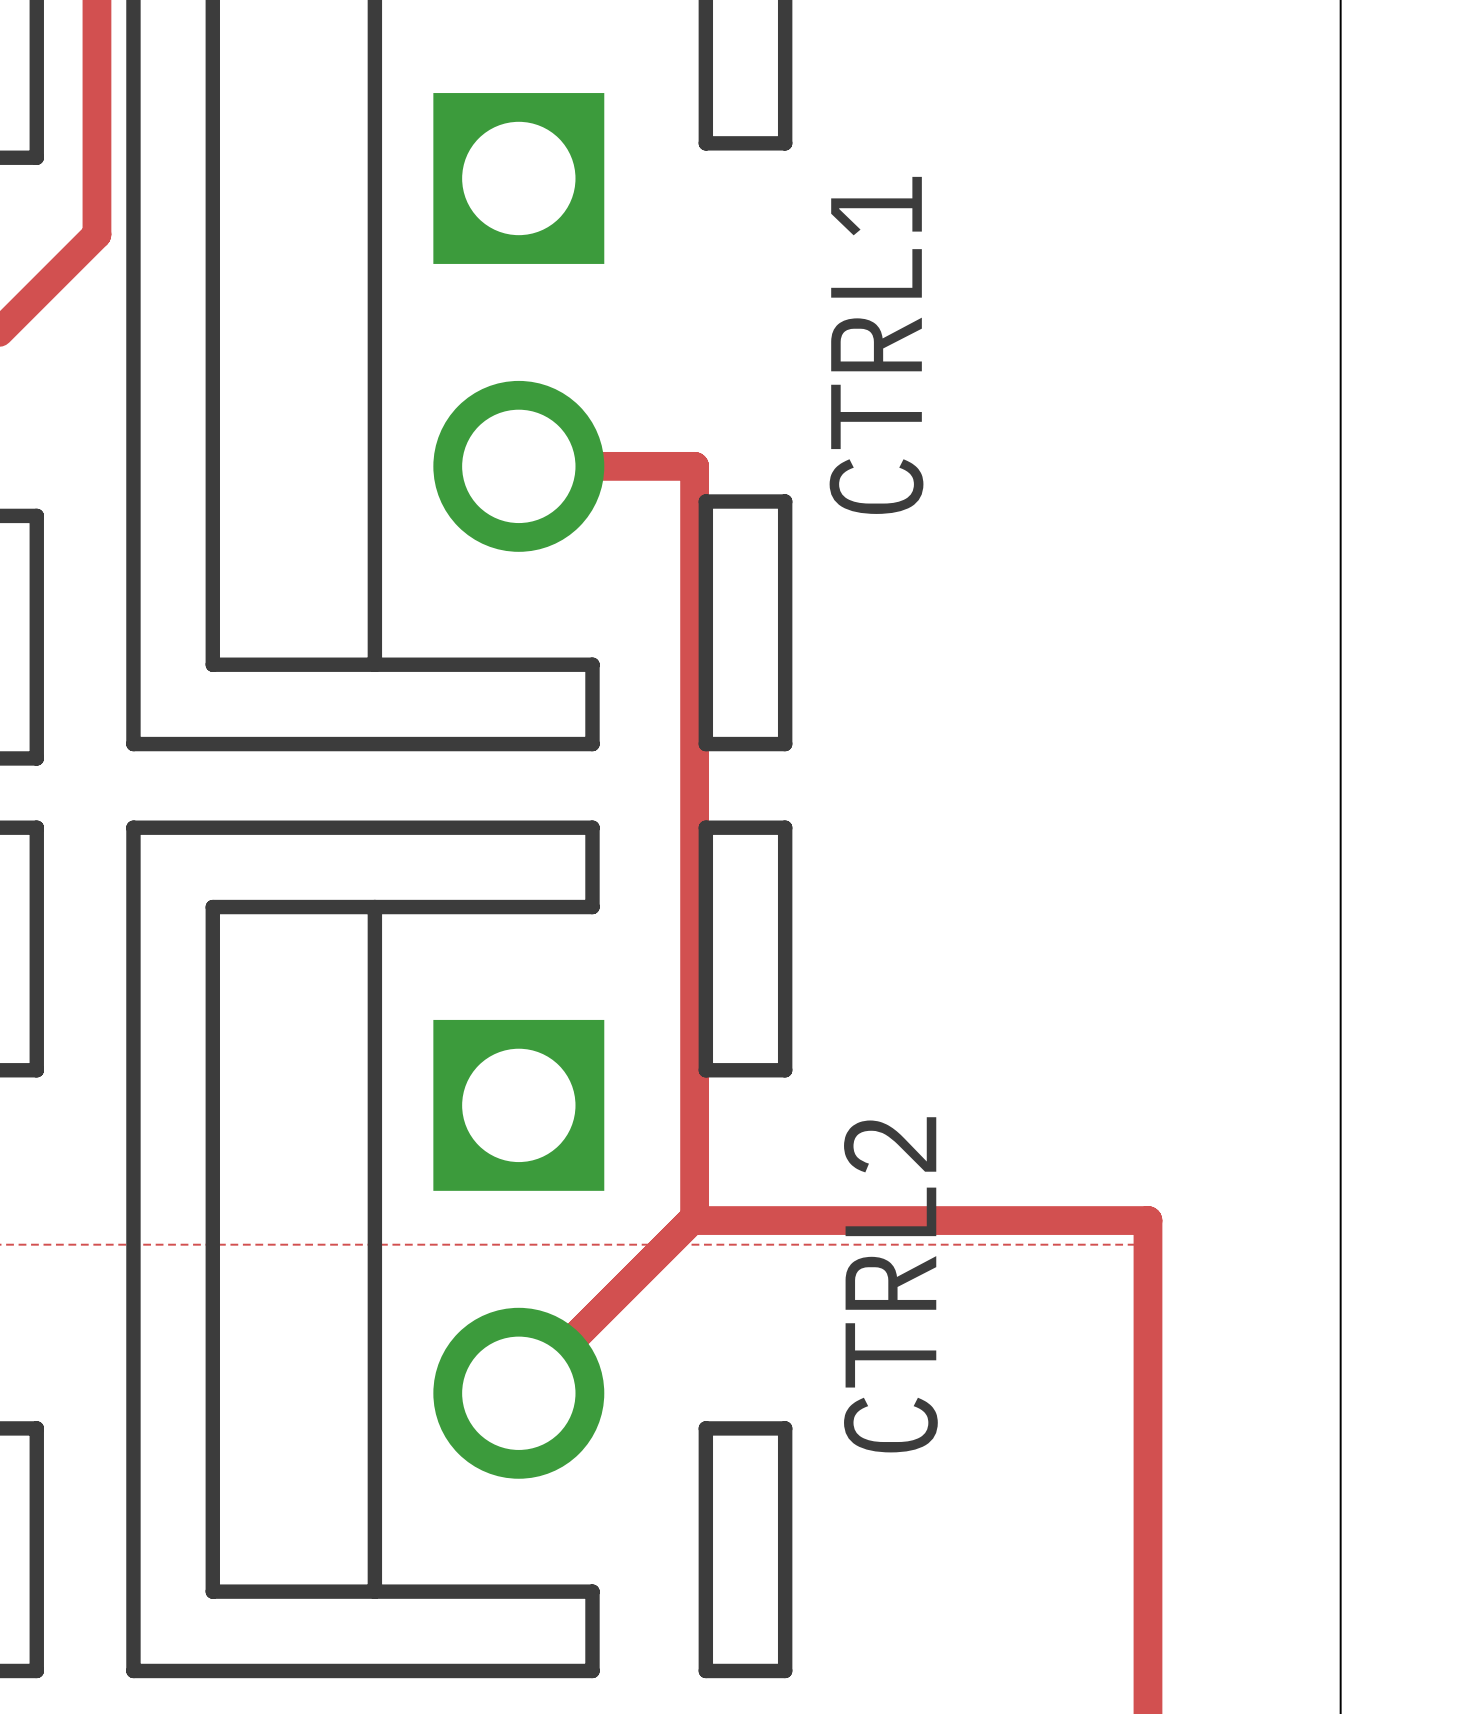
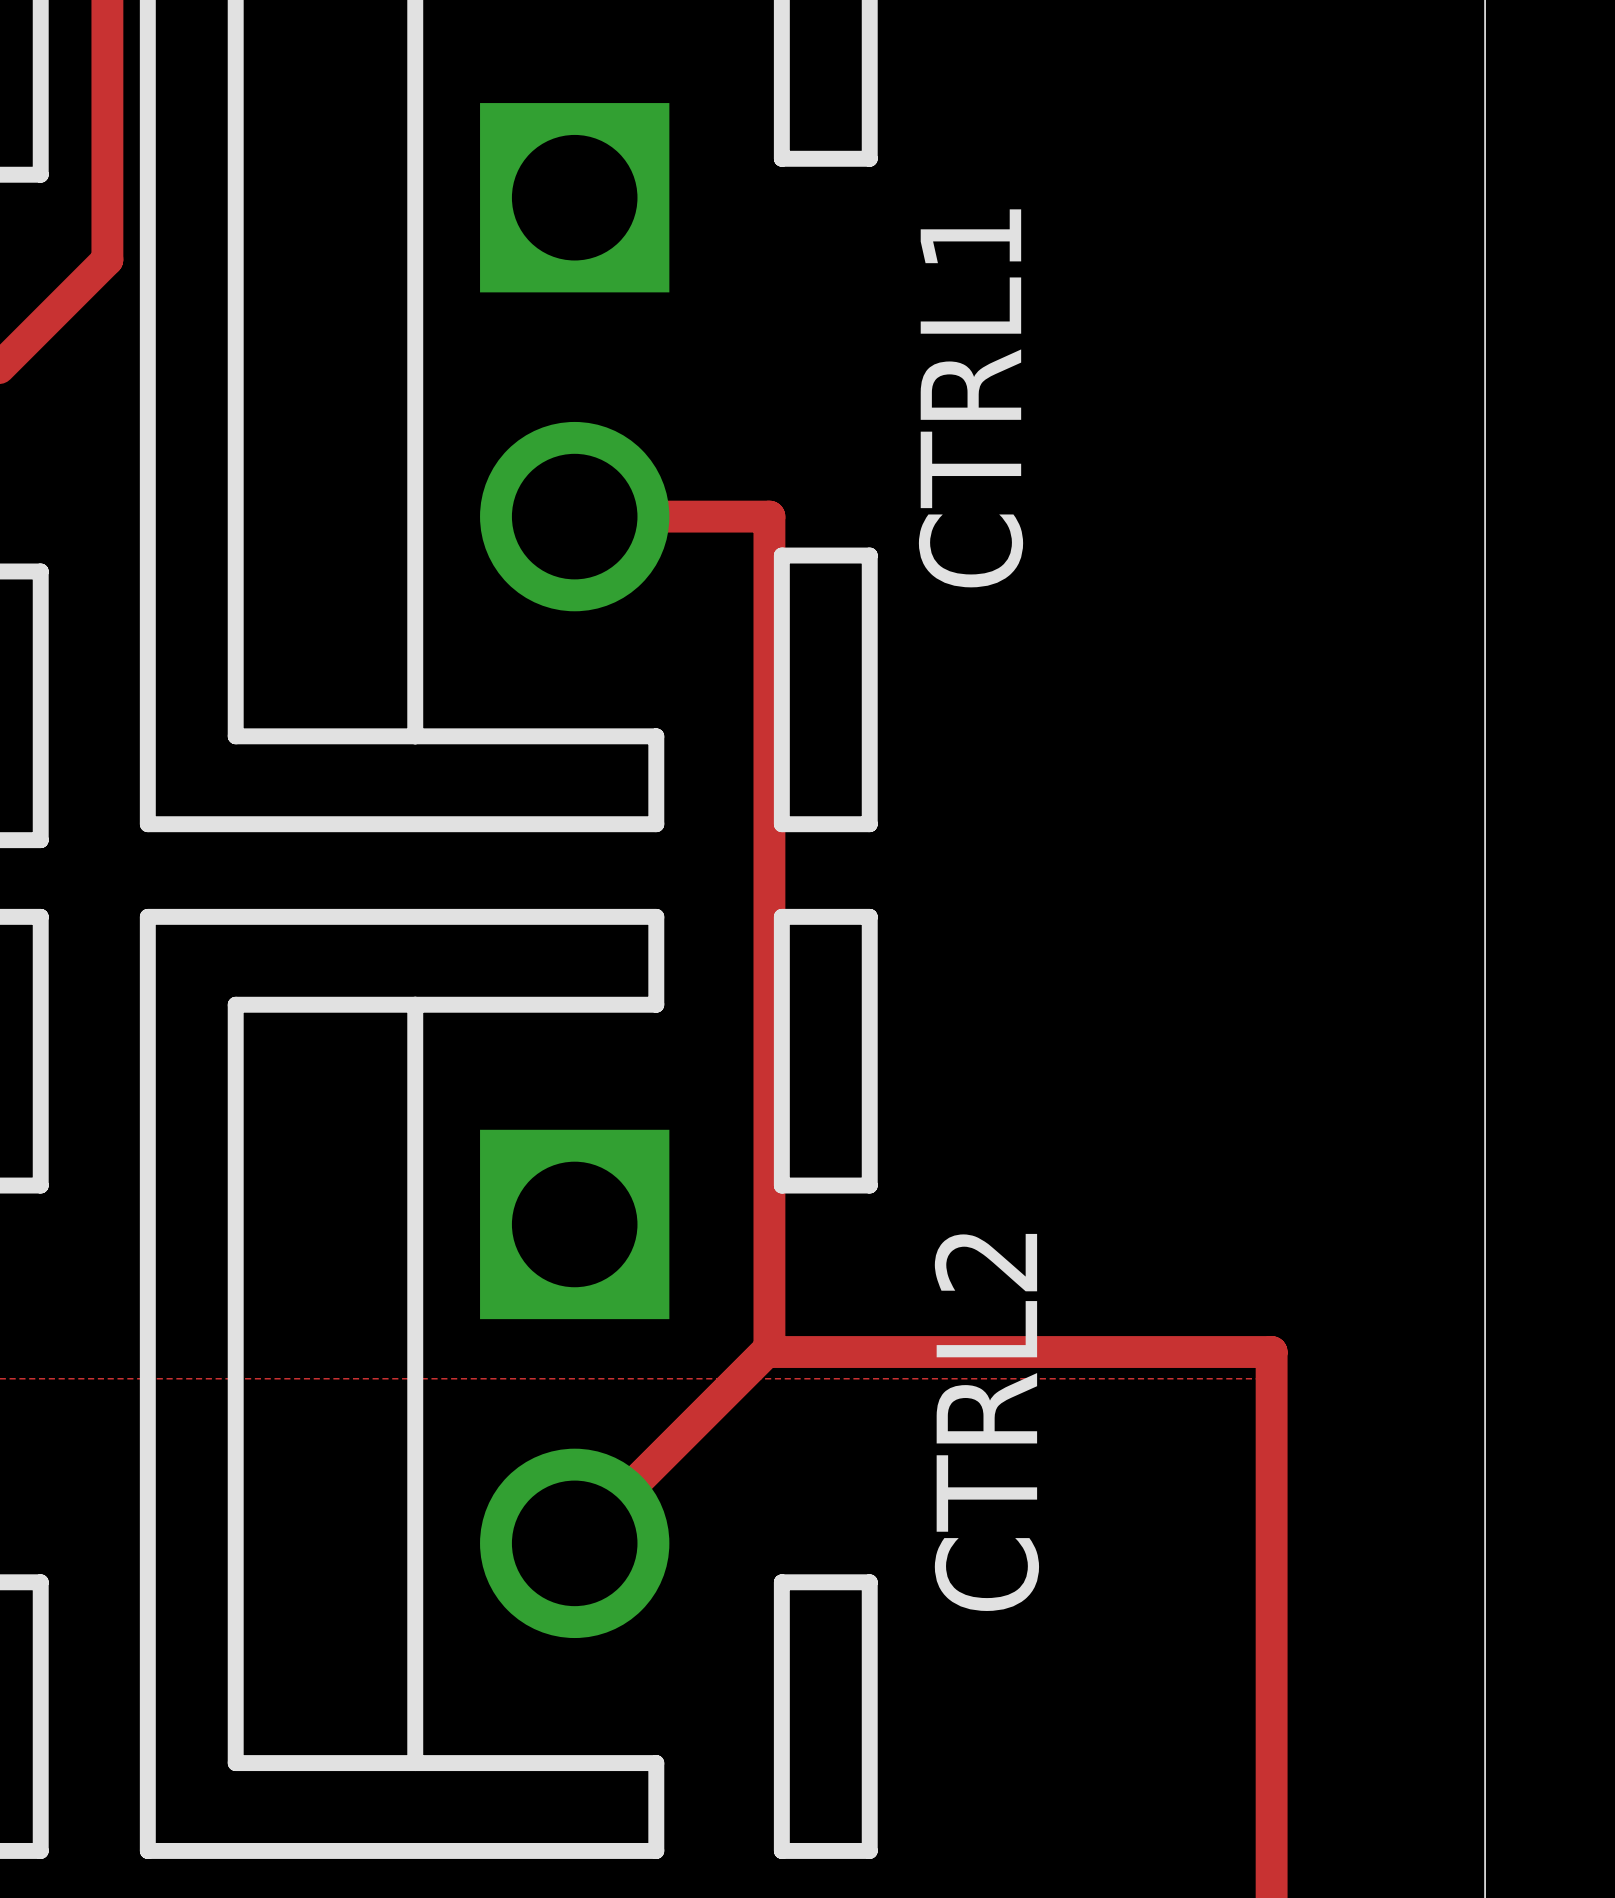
CTRL1 name position: CTRL1 (876, 345) -> CTRL1 (971, 398)

